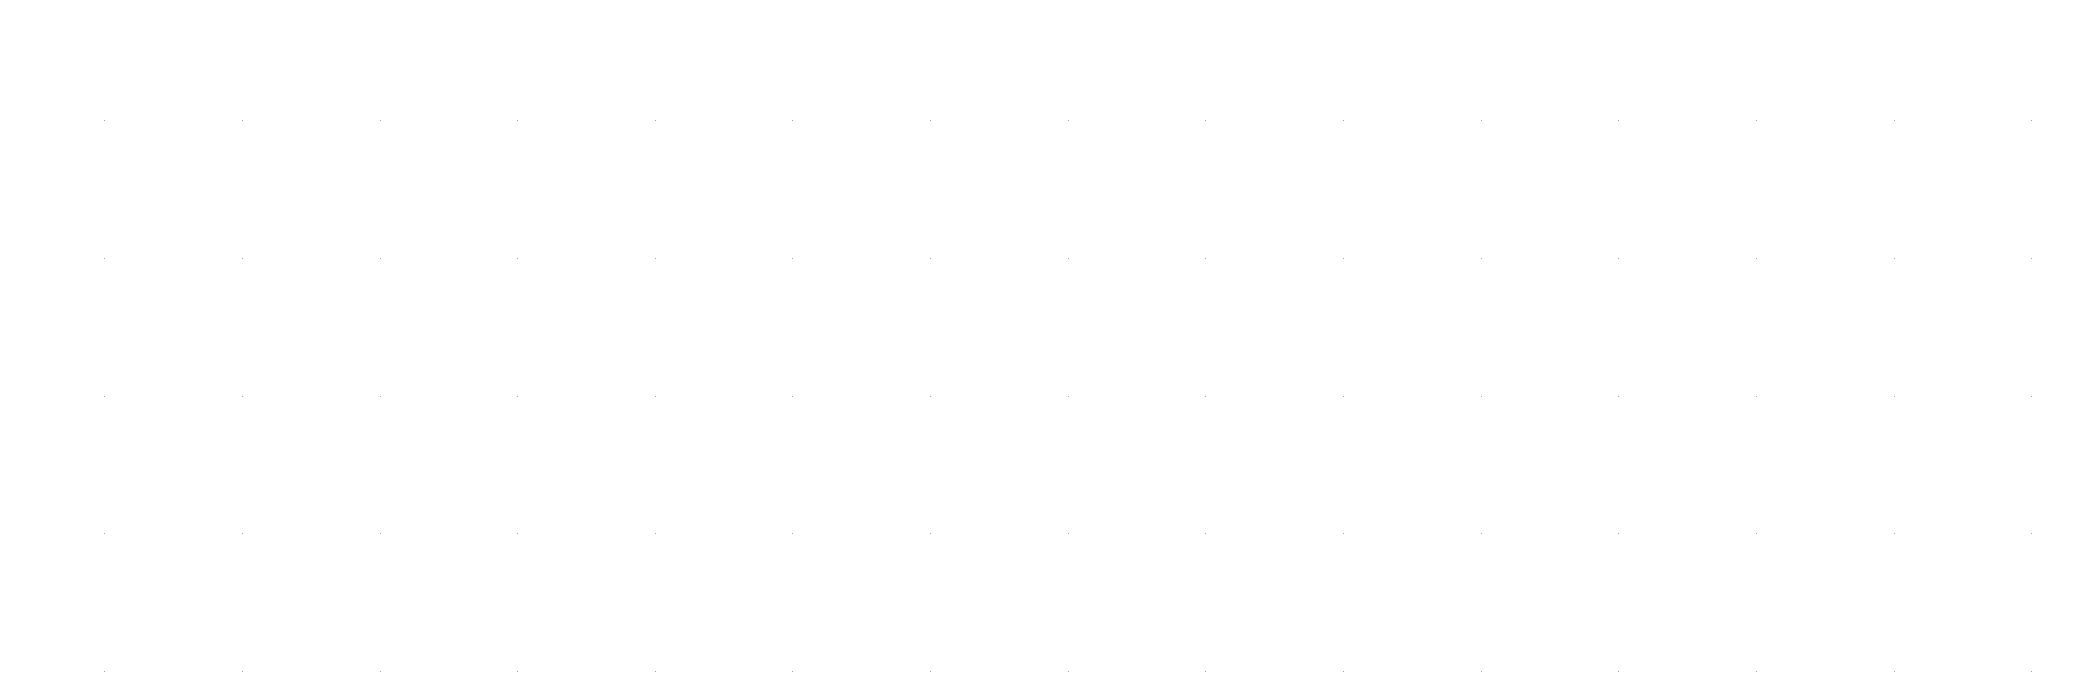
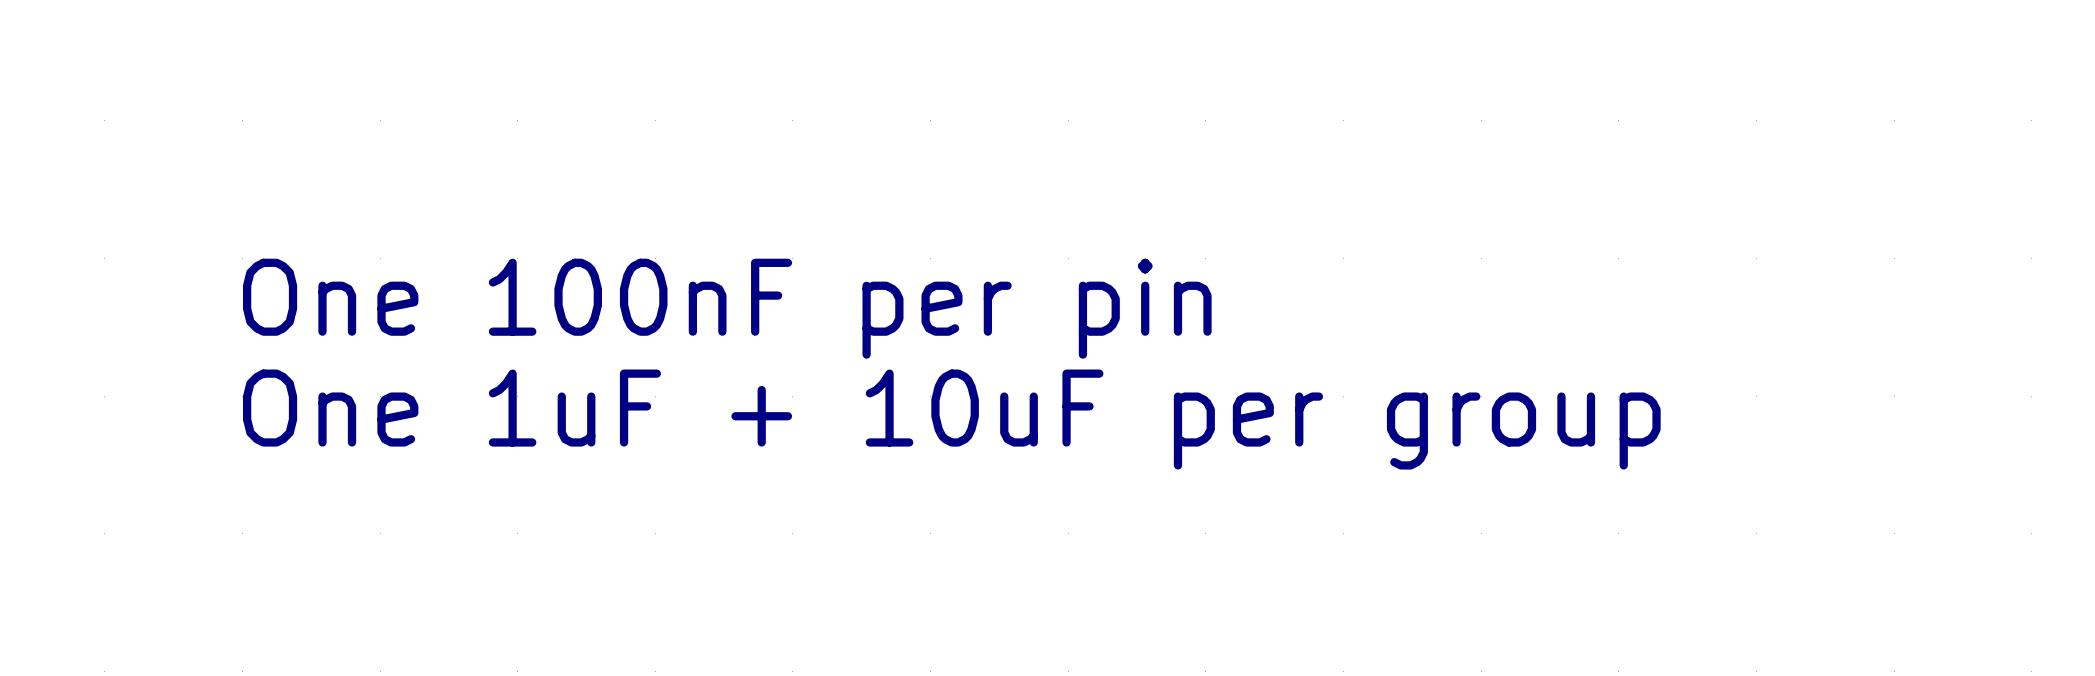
text: none -> One 100nF per pin (727, 308)
text: none -> One 1uF + 10uF per group (951, 419)

